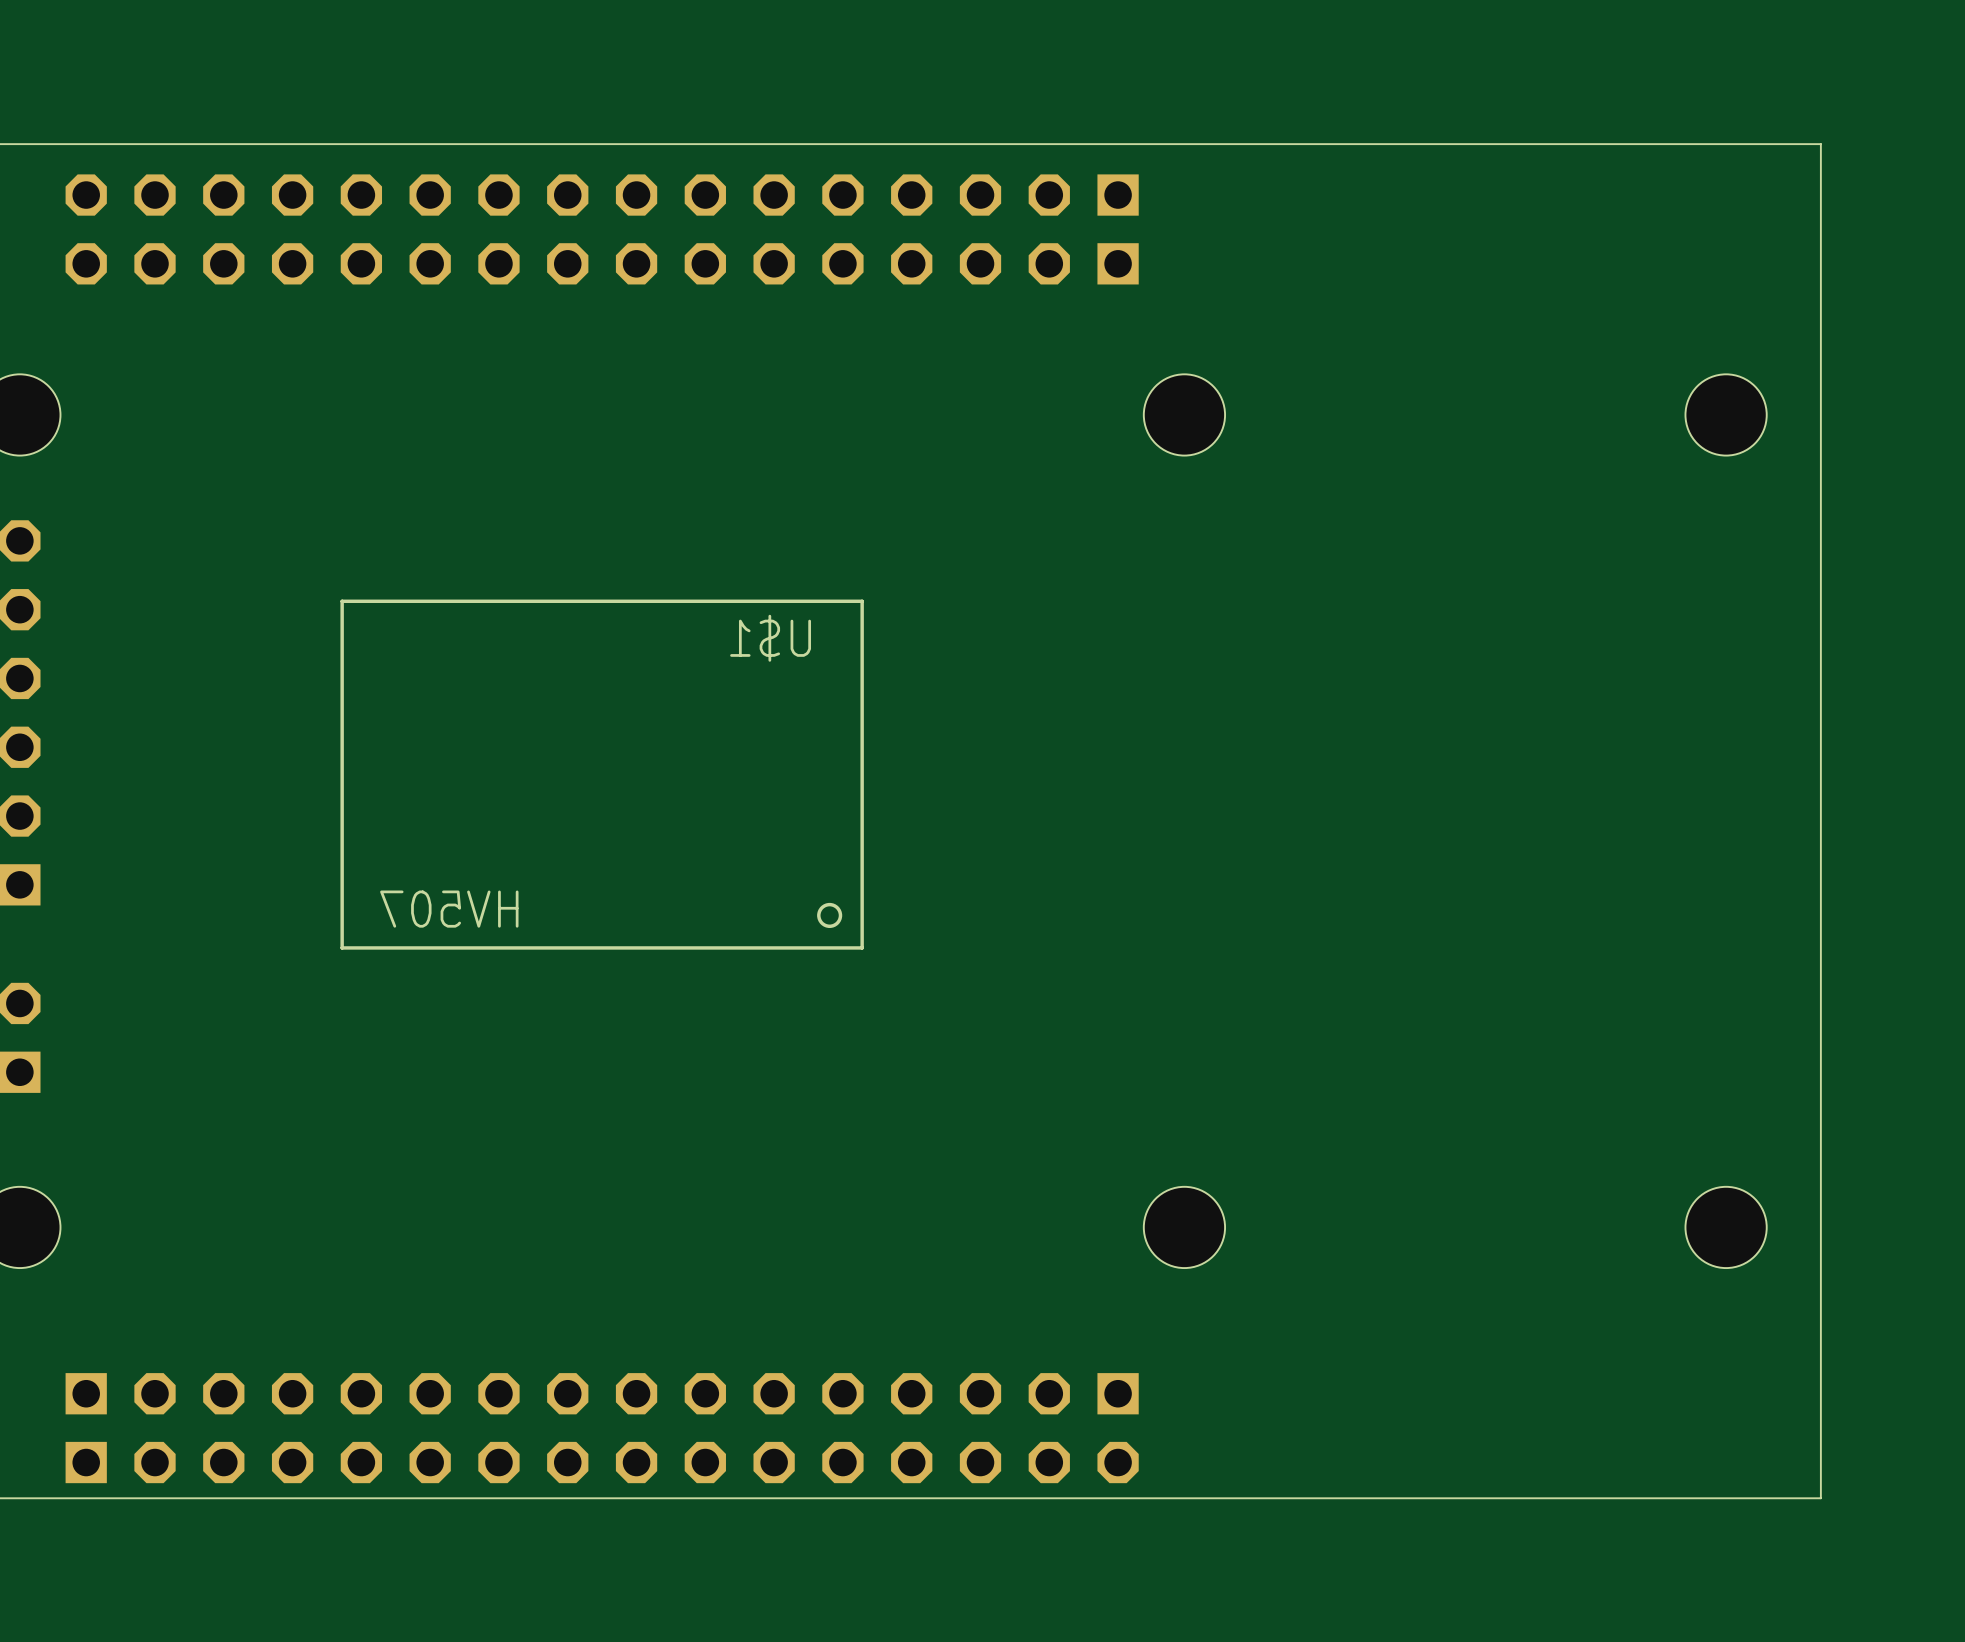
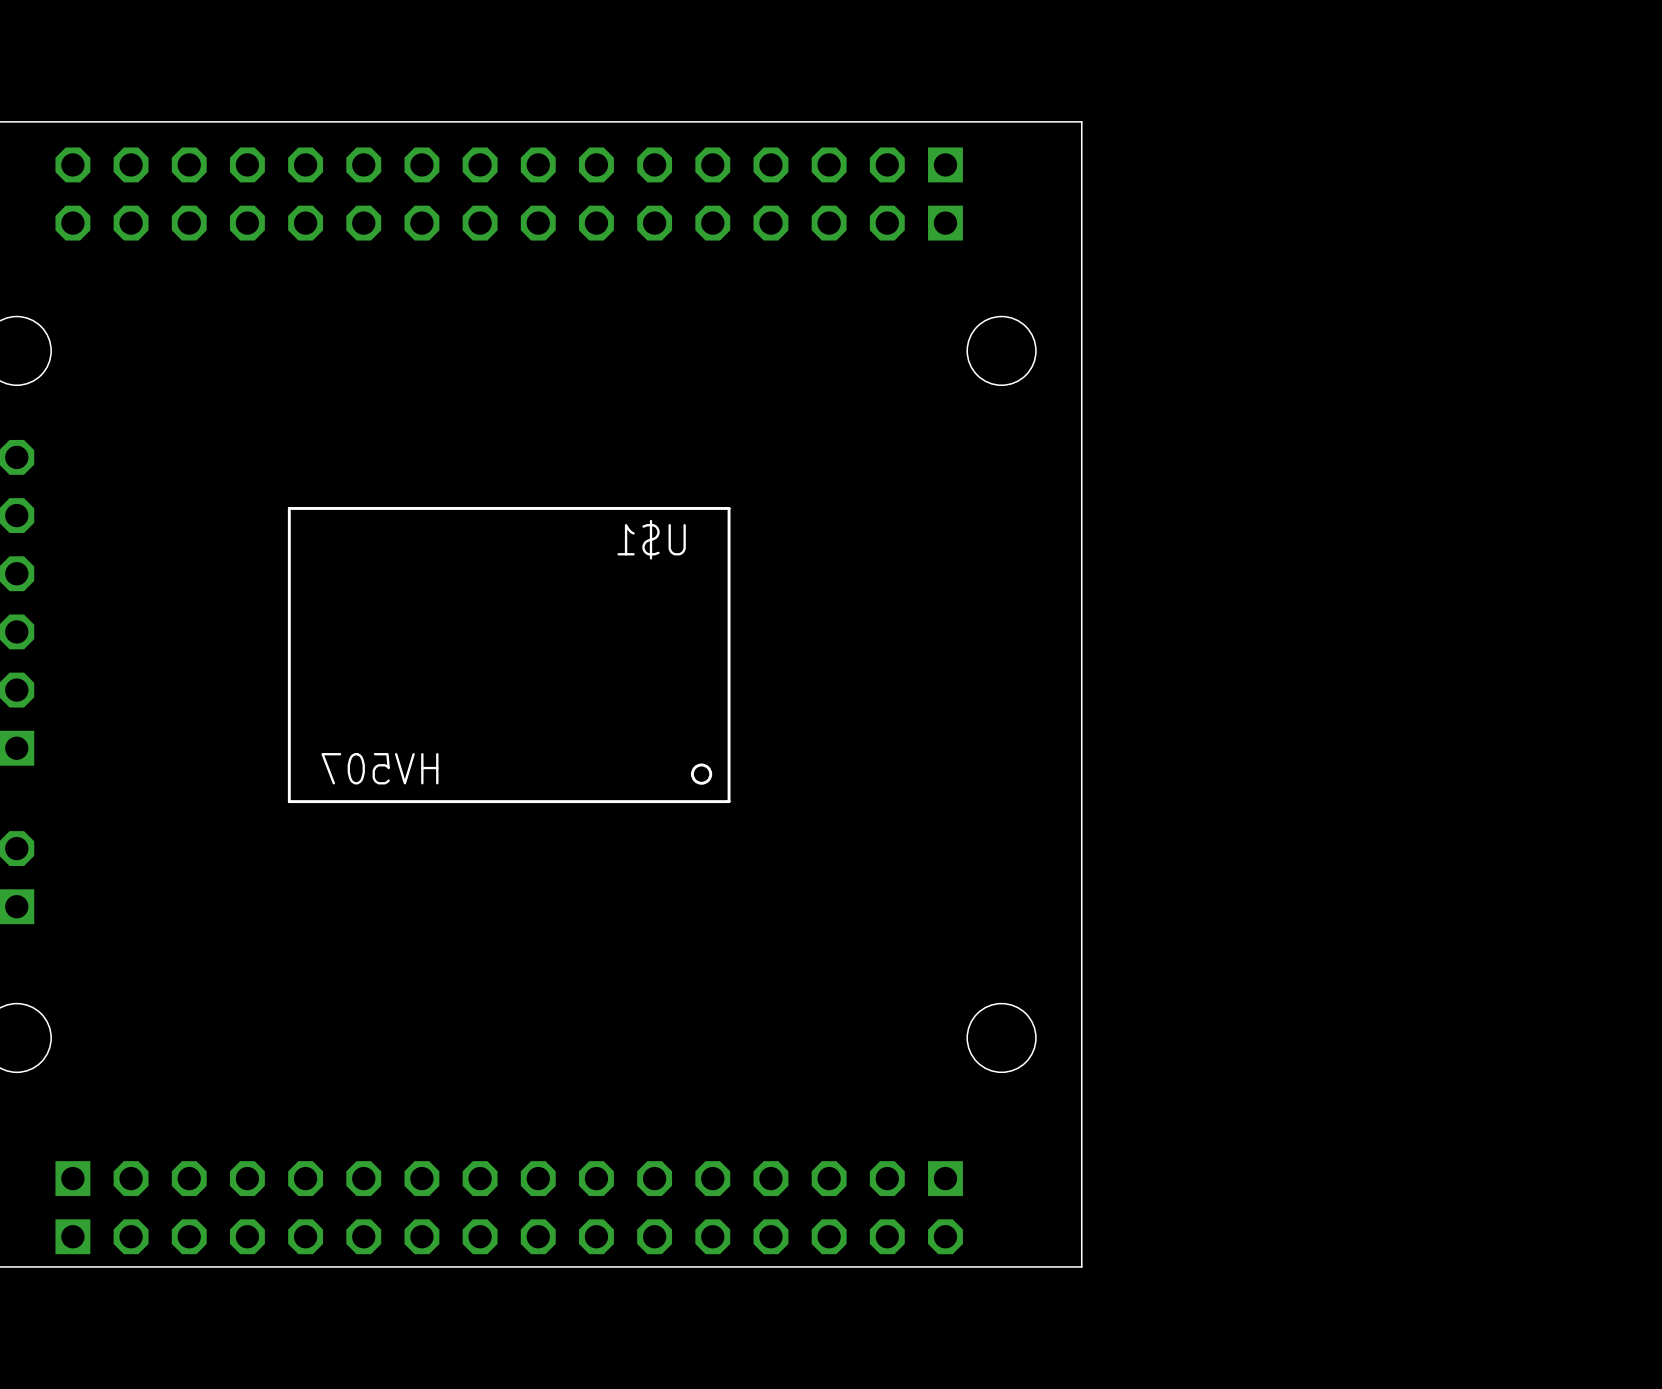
board edge: (1279, 144) (1820, 144) (1820, 1498) (1279, 1498) -> (1081, 121) (1081, 1266)
hole: (1726, 414) -> none
hole: (1726, 1227) -> none

